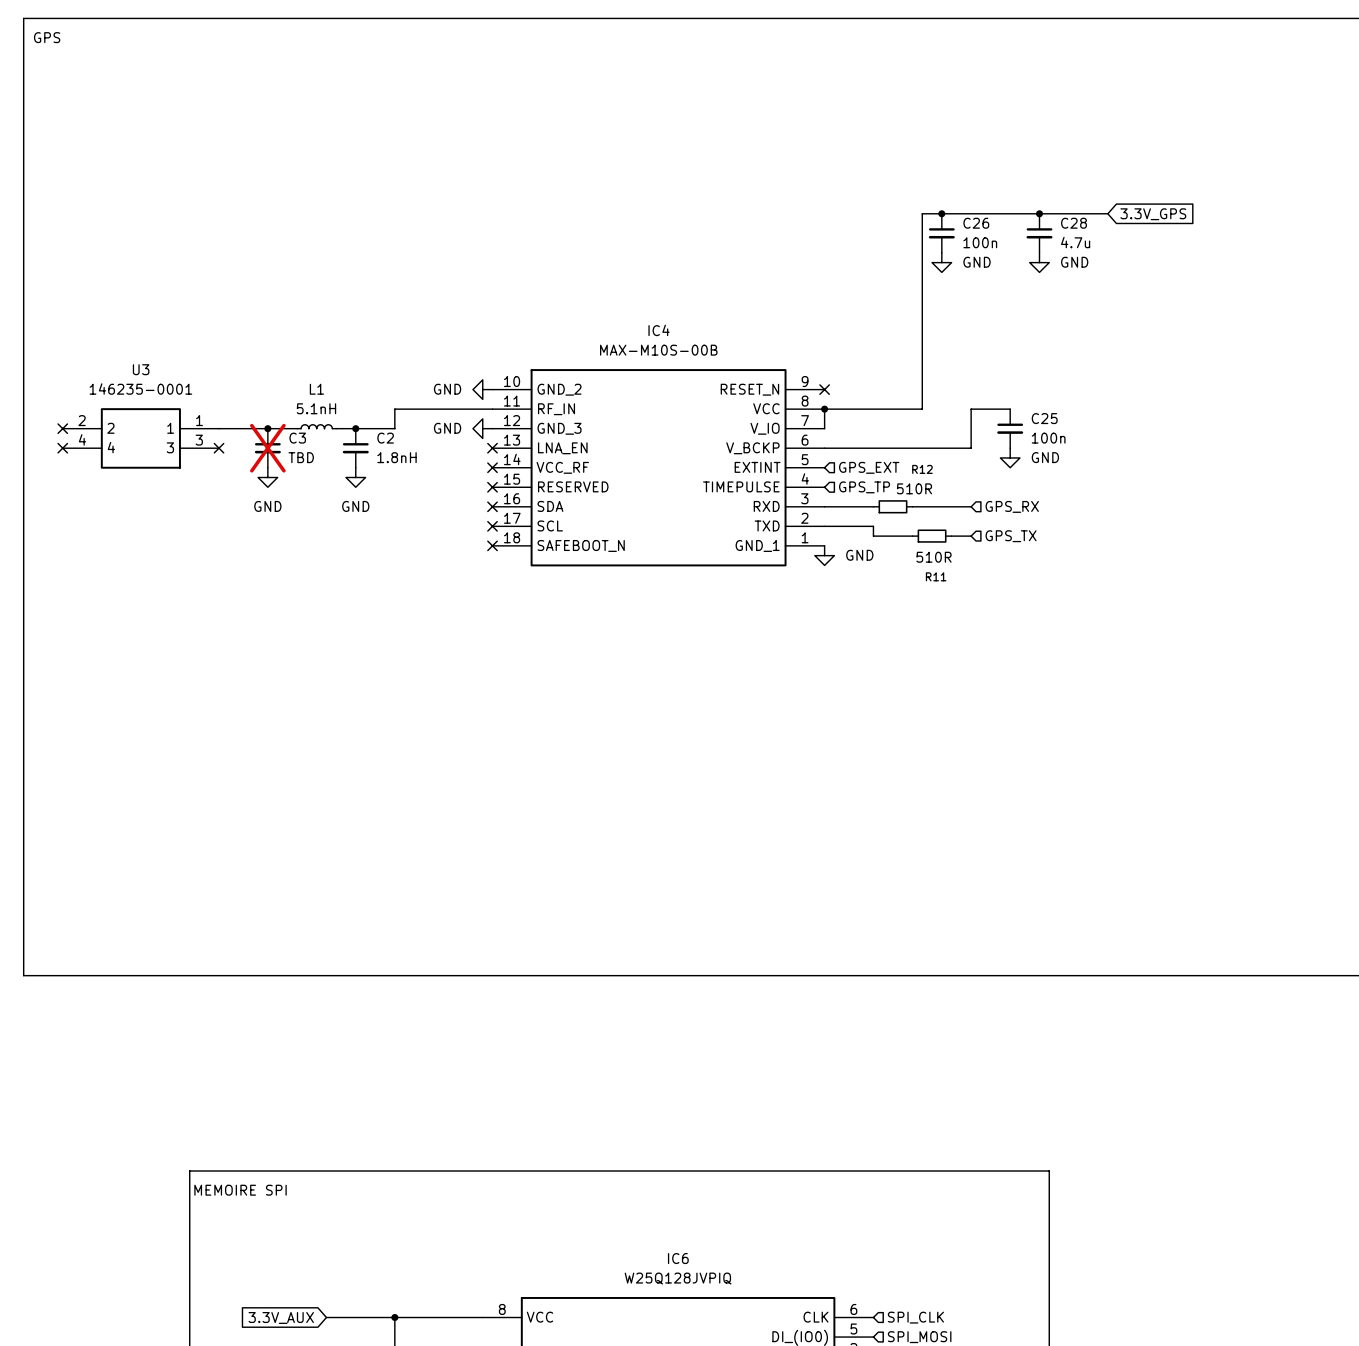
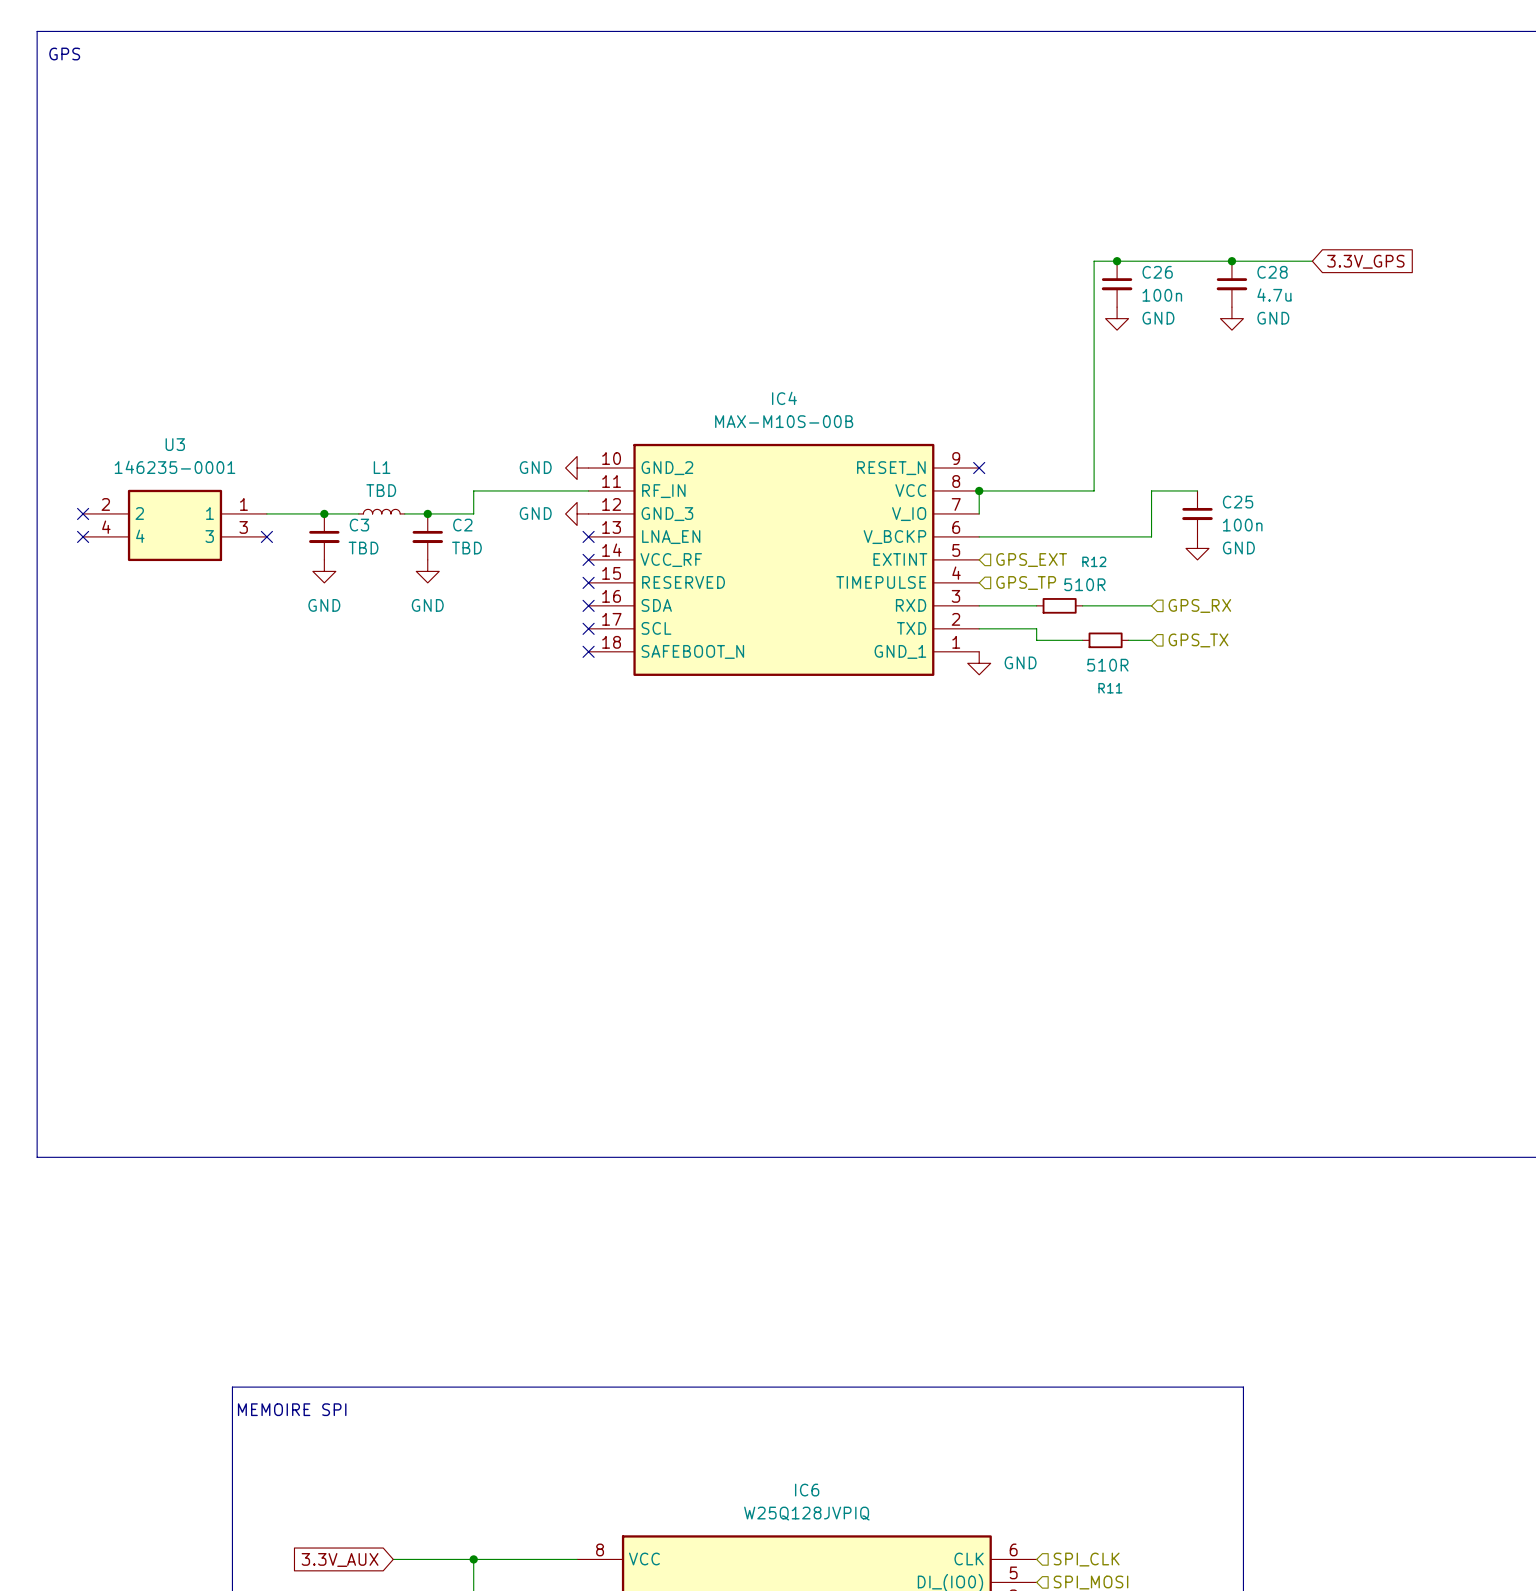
L1 value: 5.1nH (316, 408) -> TBD (381, 490)
C3 do-not-place cross: (267, 448) -> none
C2 value: 1.8nH (397, 457) -> TBD (466, 548)

